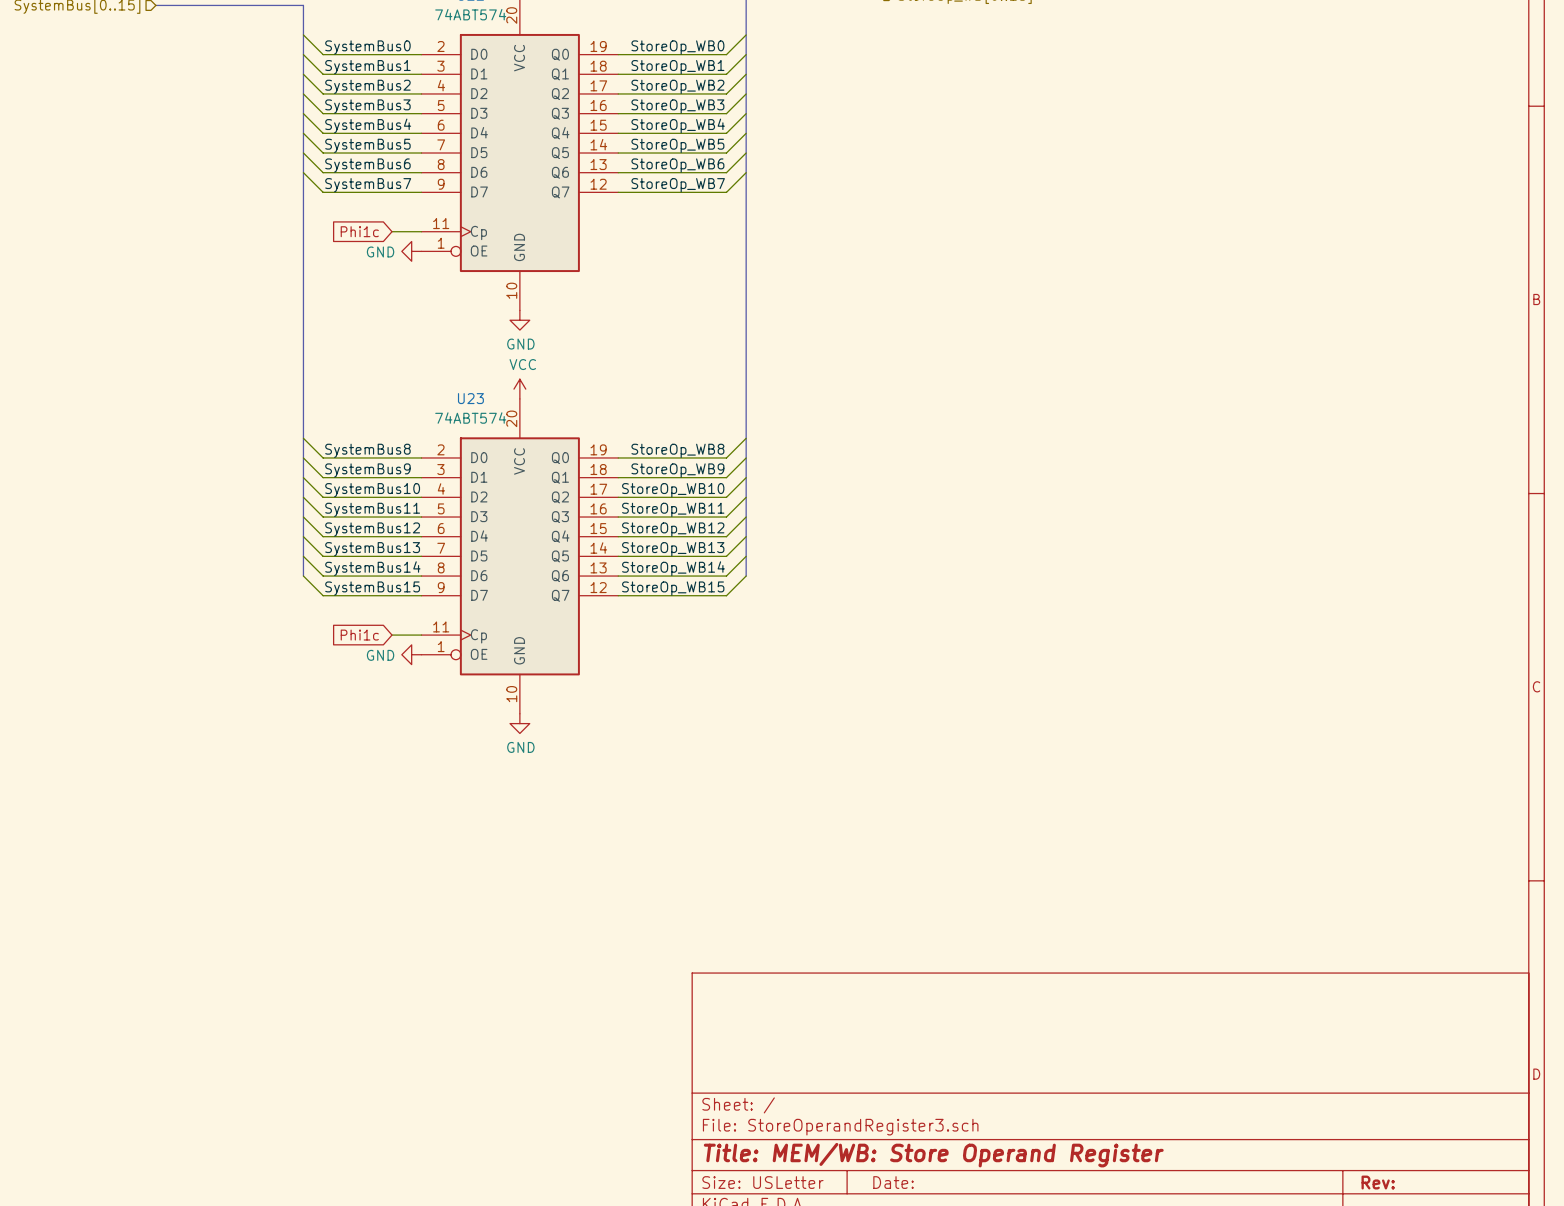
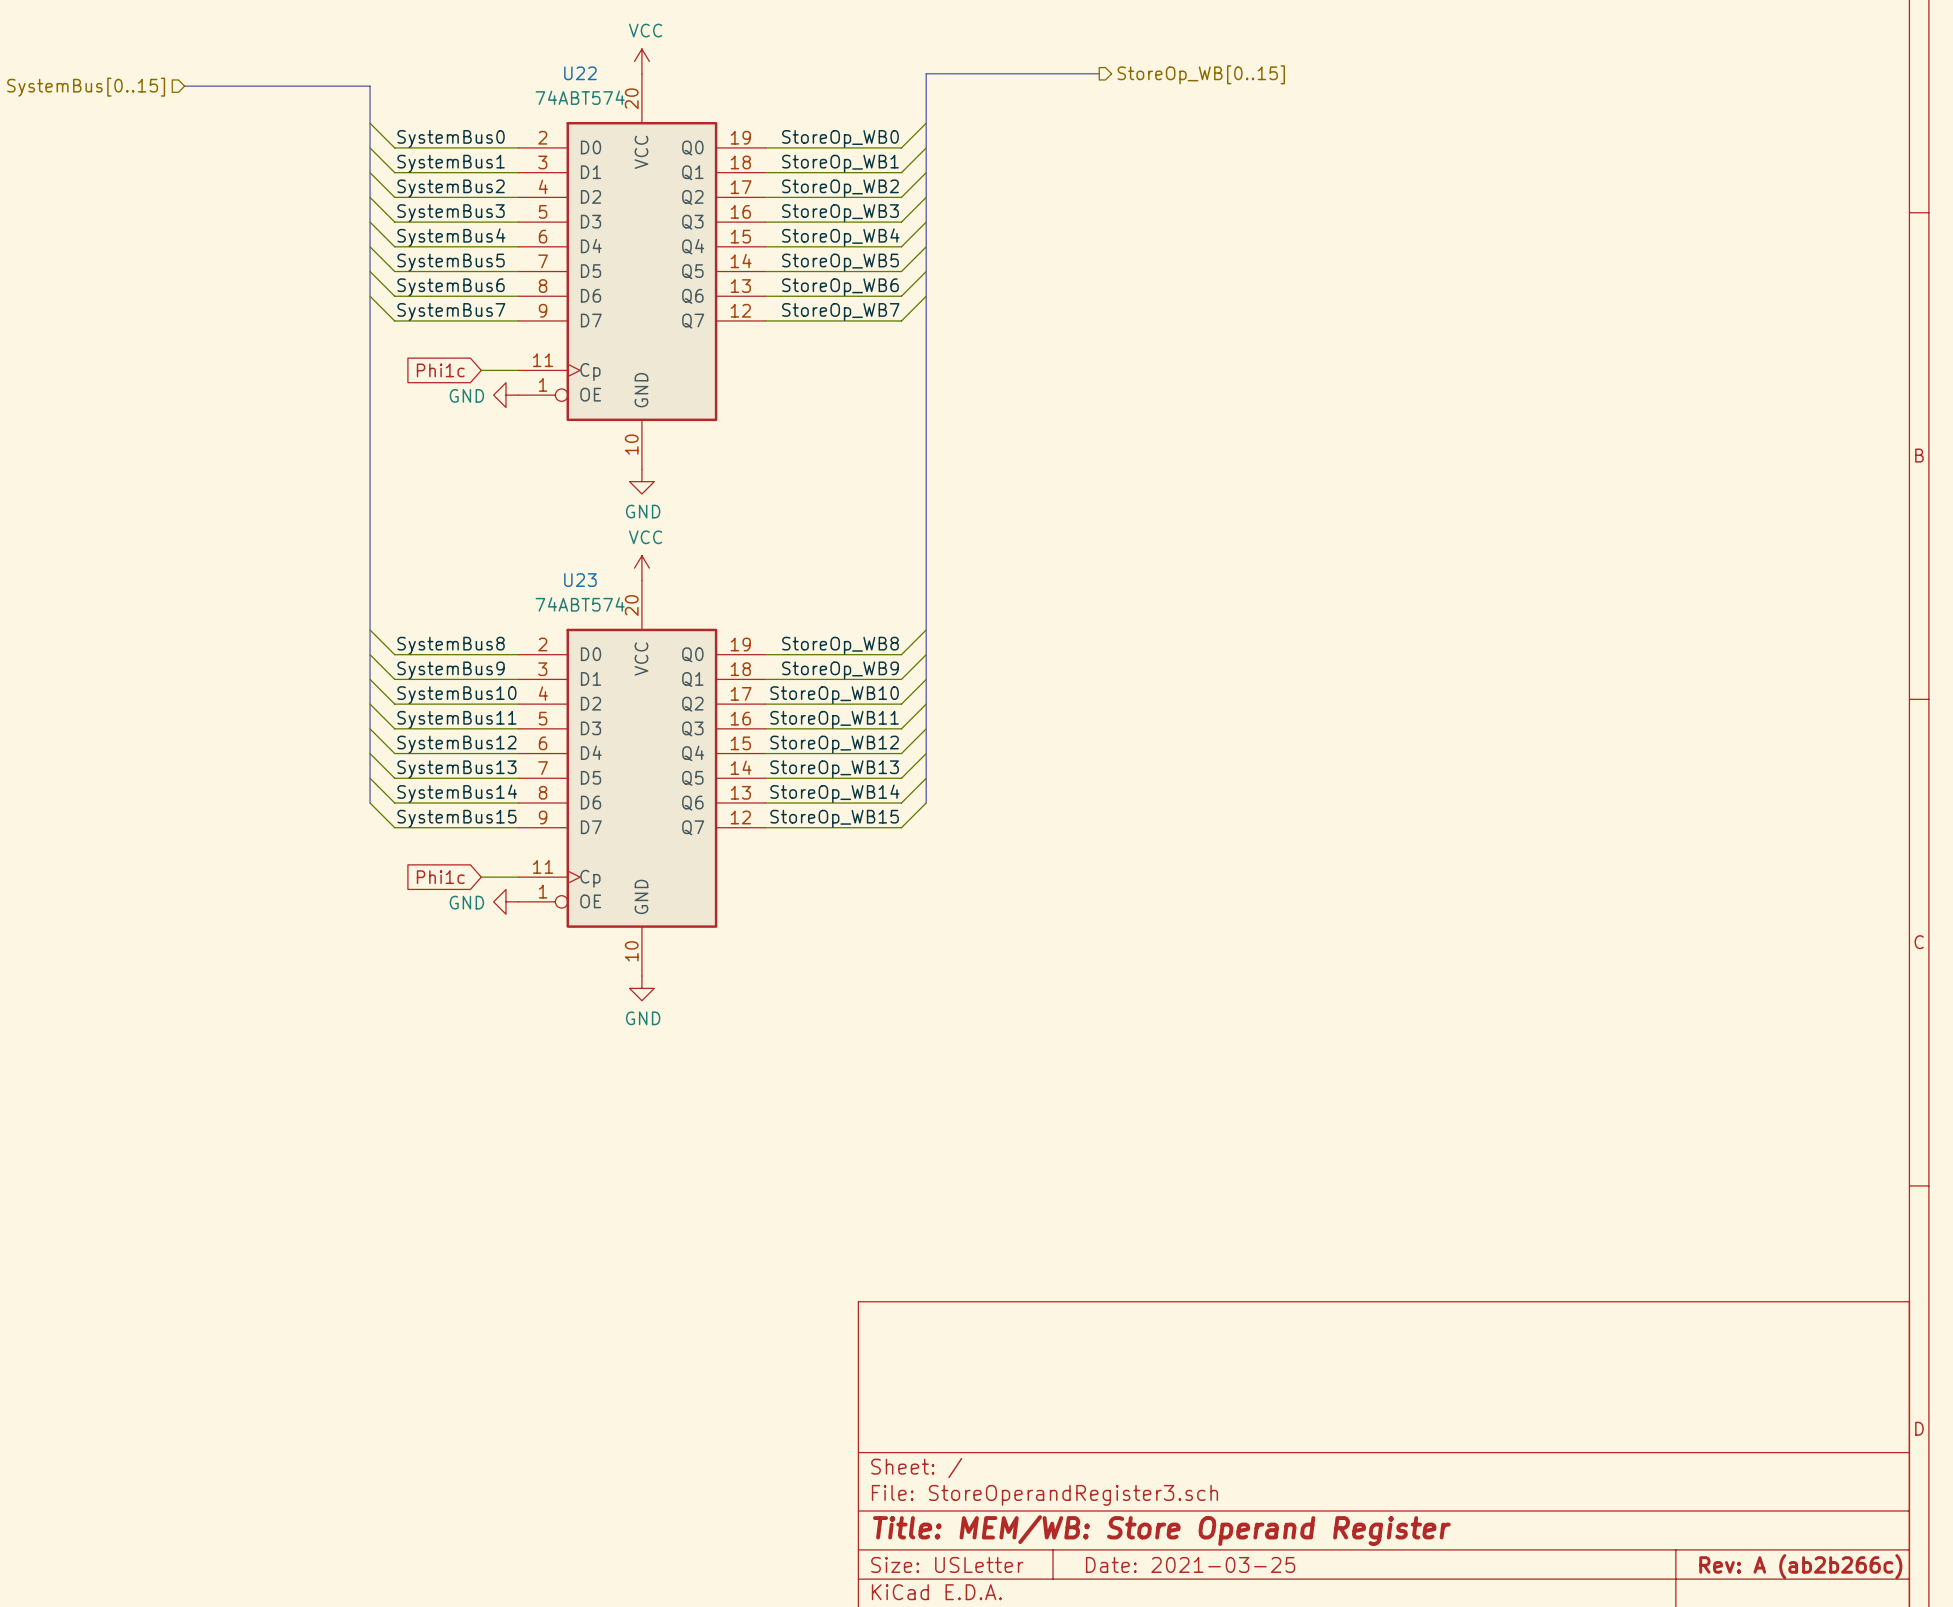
title block: Date: (893, 1182) -> Date: 2021-03-25 (1190, 1564)
title block: Rev: (1378, 1182) -> Rev: A (ab2b266c) (1800, 1566)

